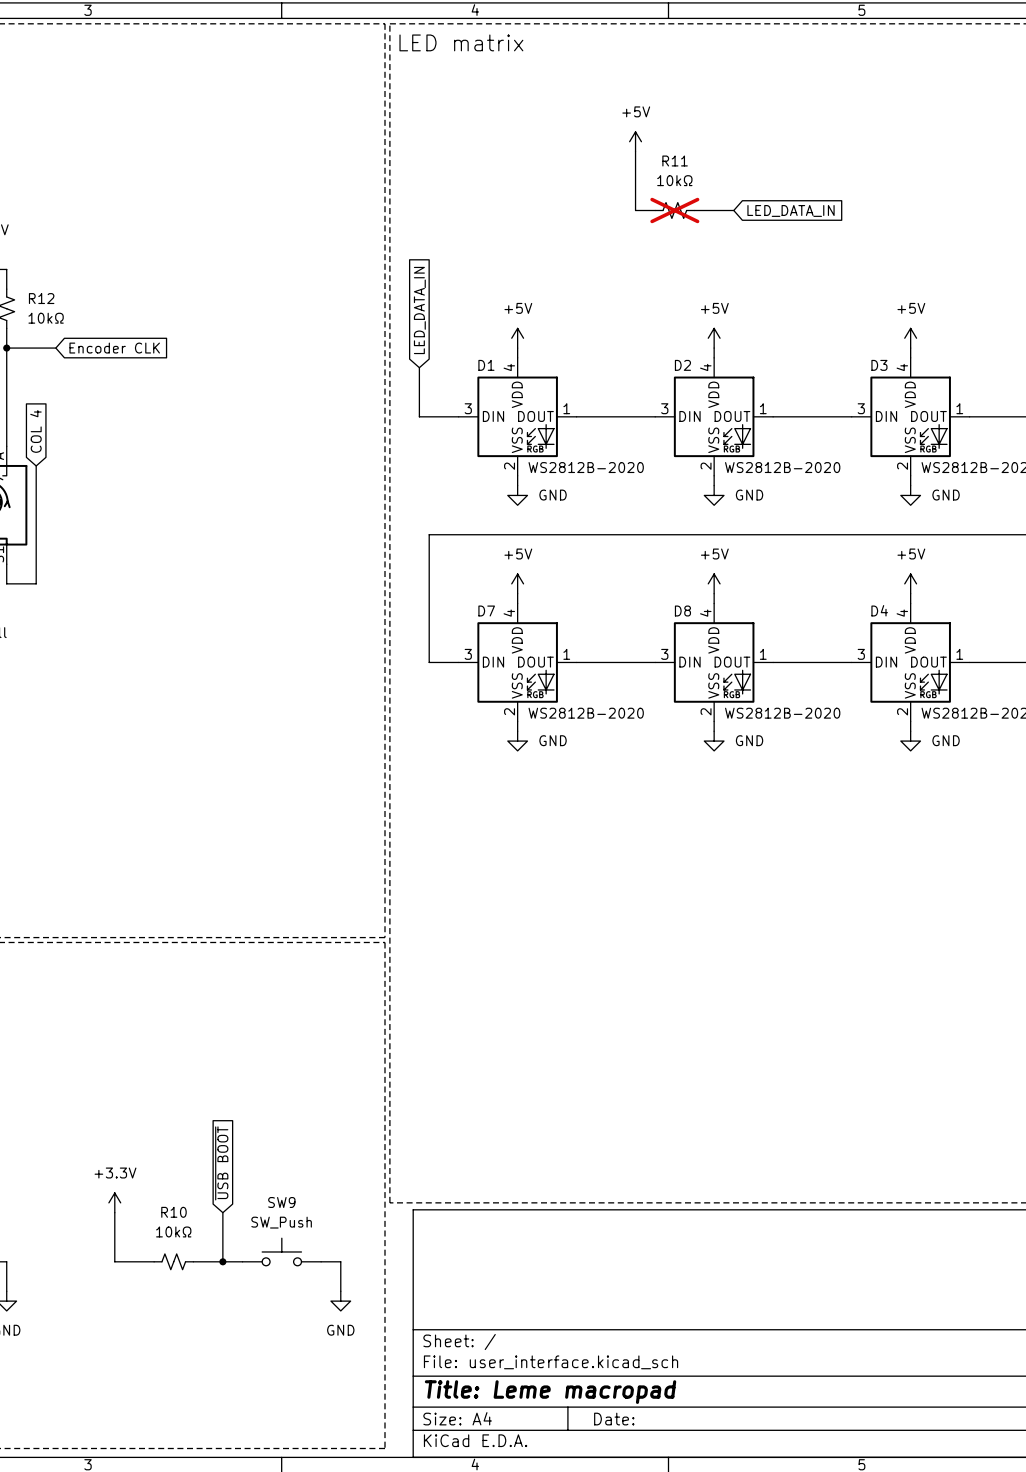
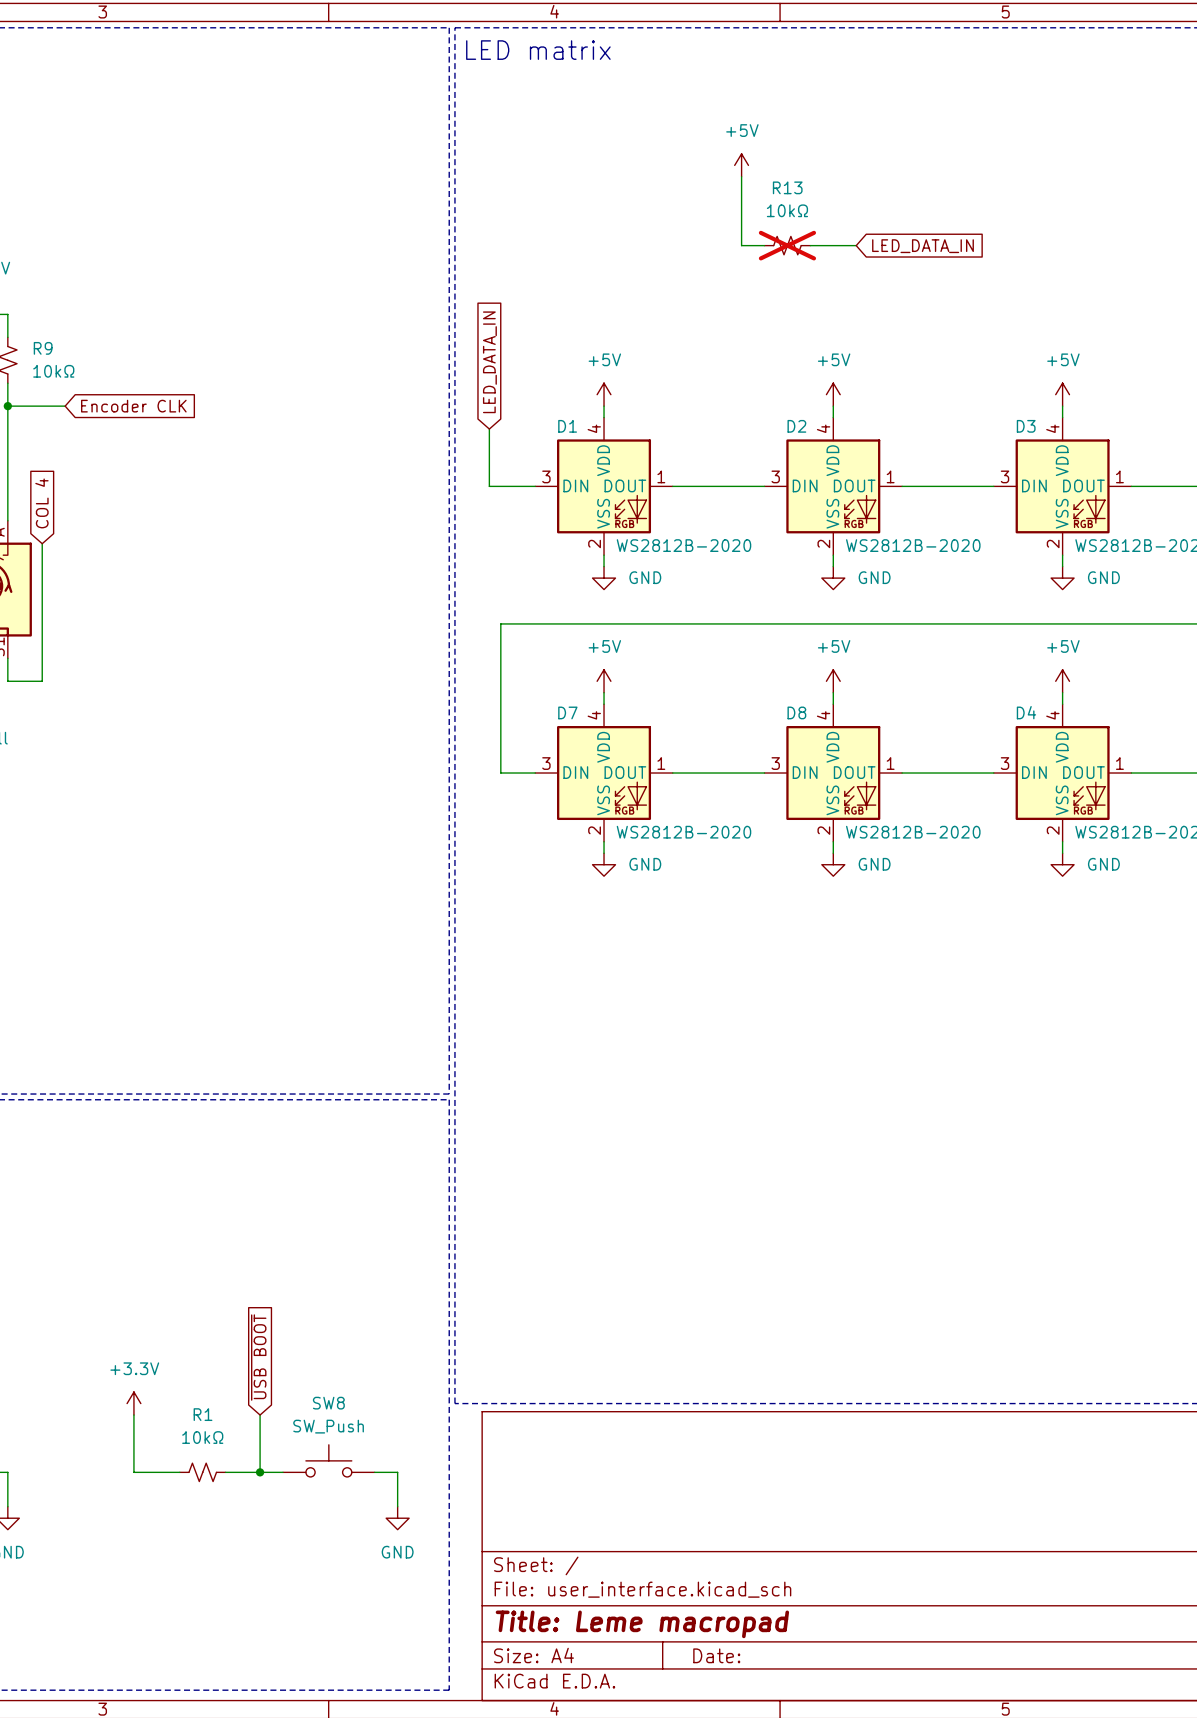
R11 name: R11 (675, 161) -> R13 (787, 187)
R12 name: R12 (41, 298) -> R9 (43, 348)
SW9 name: SW9 (281, 1202) -> SW8 (328, 1403)
R10 name: R10 (173, 1212) -> R1 (203, 1414)

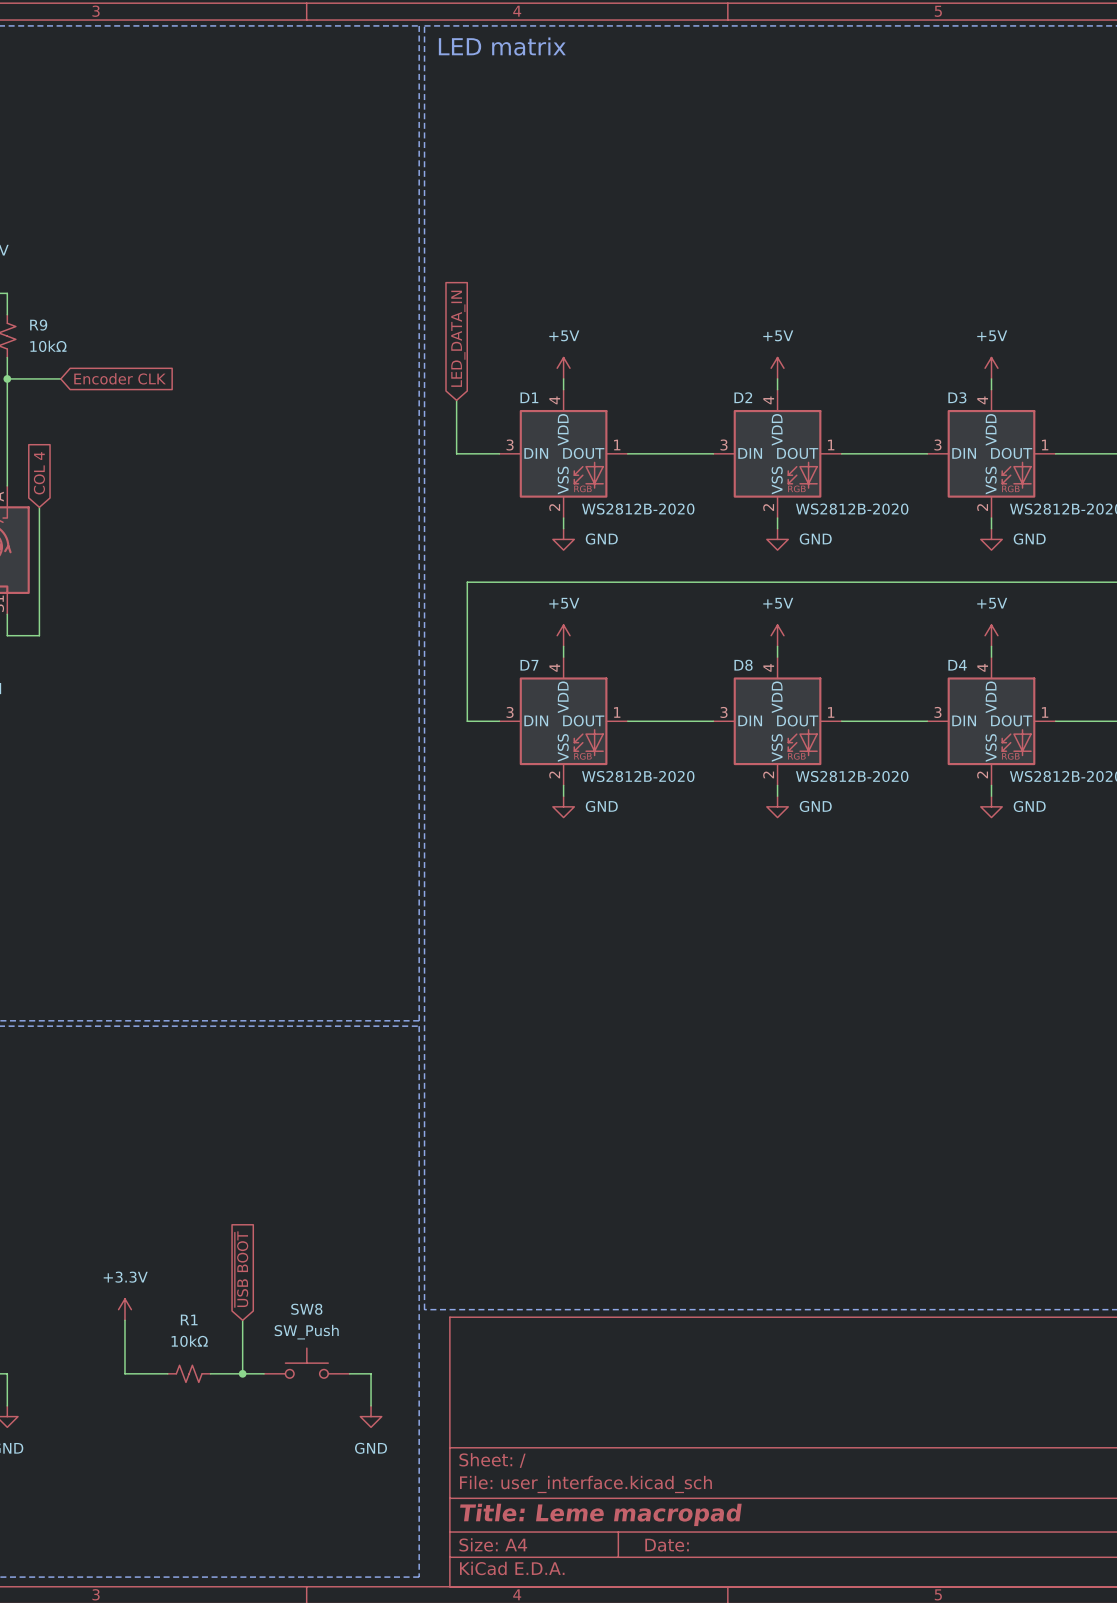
power symbol: +5V (741, 165) -> none
wire: (741, 176) (741, 245) (764, 245) -> none
R13: 10kΩ (787, 245) -> none
wire: (810, 245) (856, 245) -> none
global label: LED_DATA_IN (922, 246) -> none

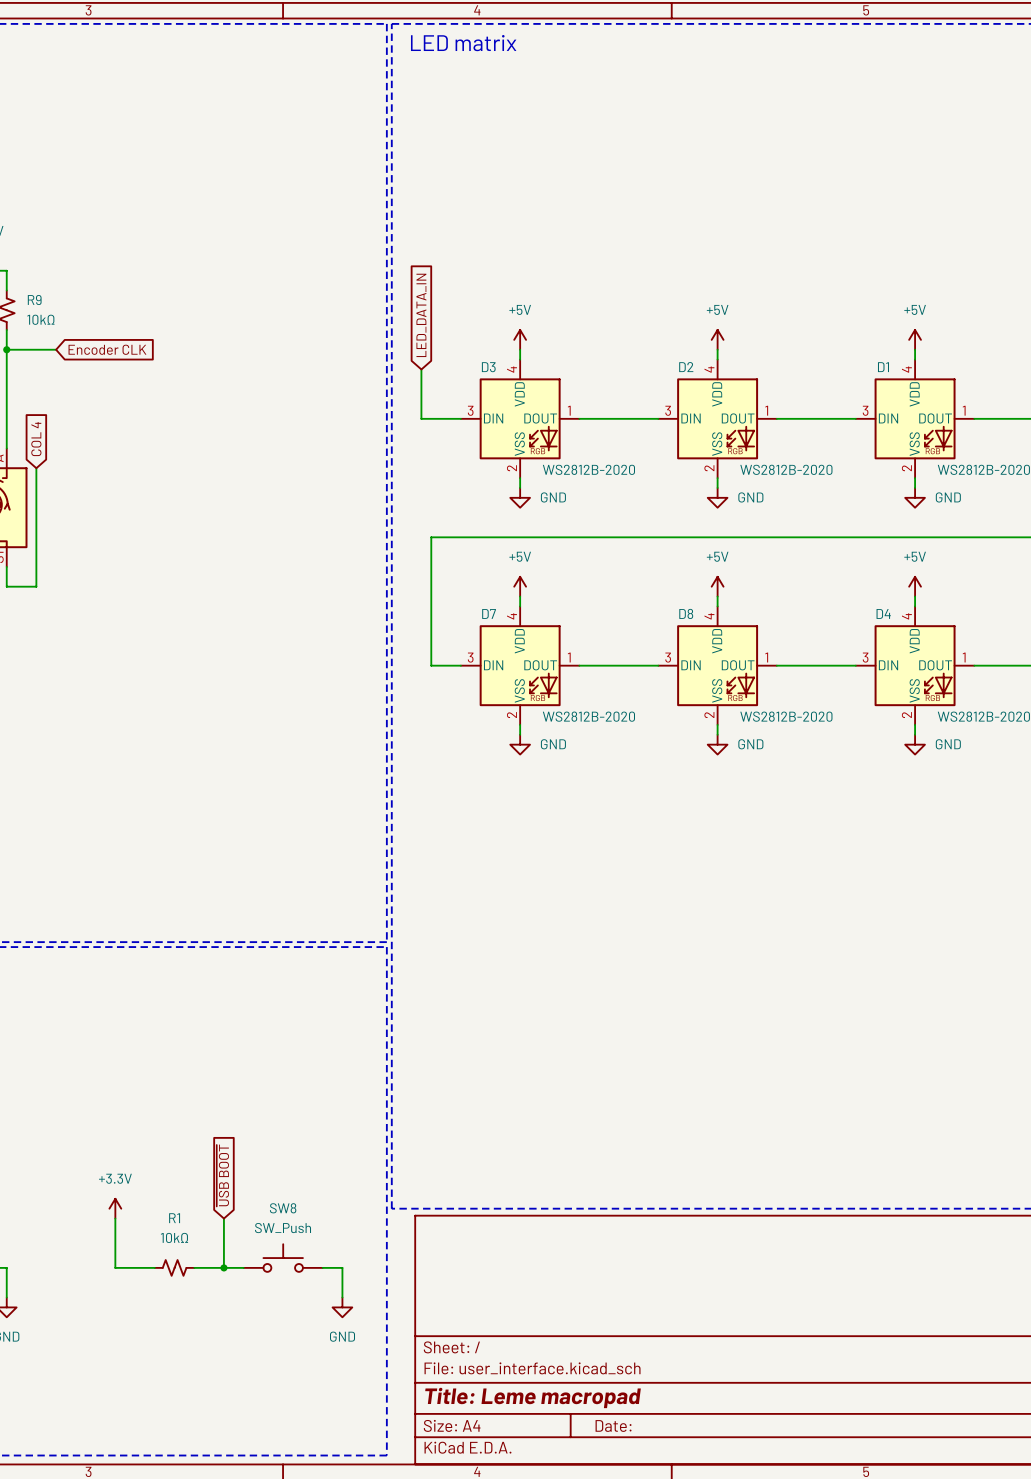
D1 name: D1 (529, 397) -> D3 (488, 367)
D3 name: D3 (957, 397) -> D1 (883, 367)

